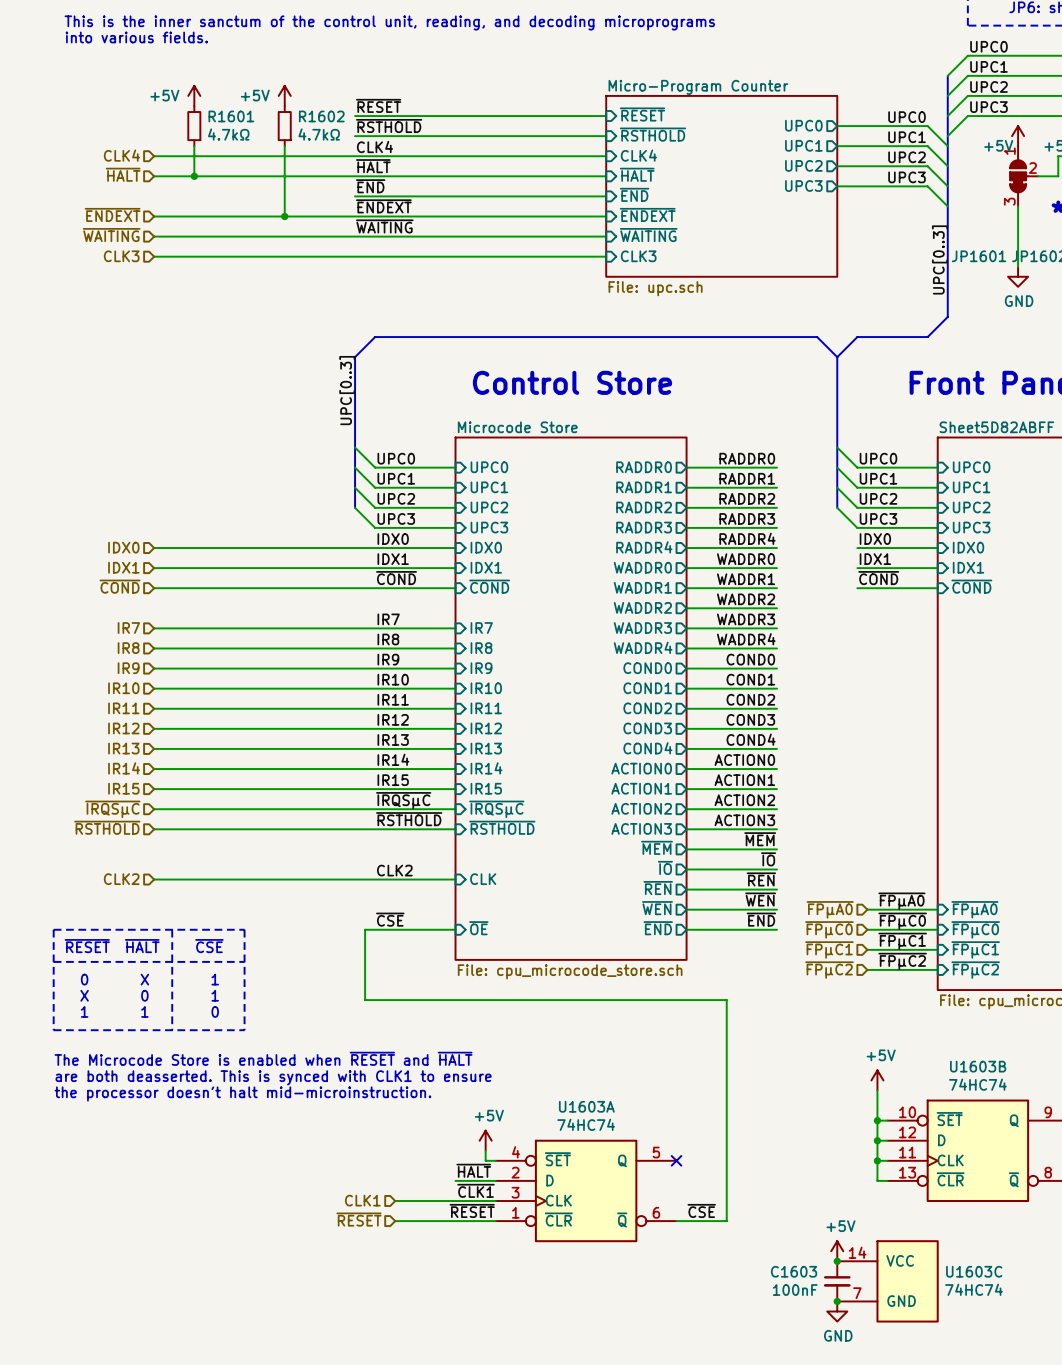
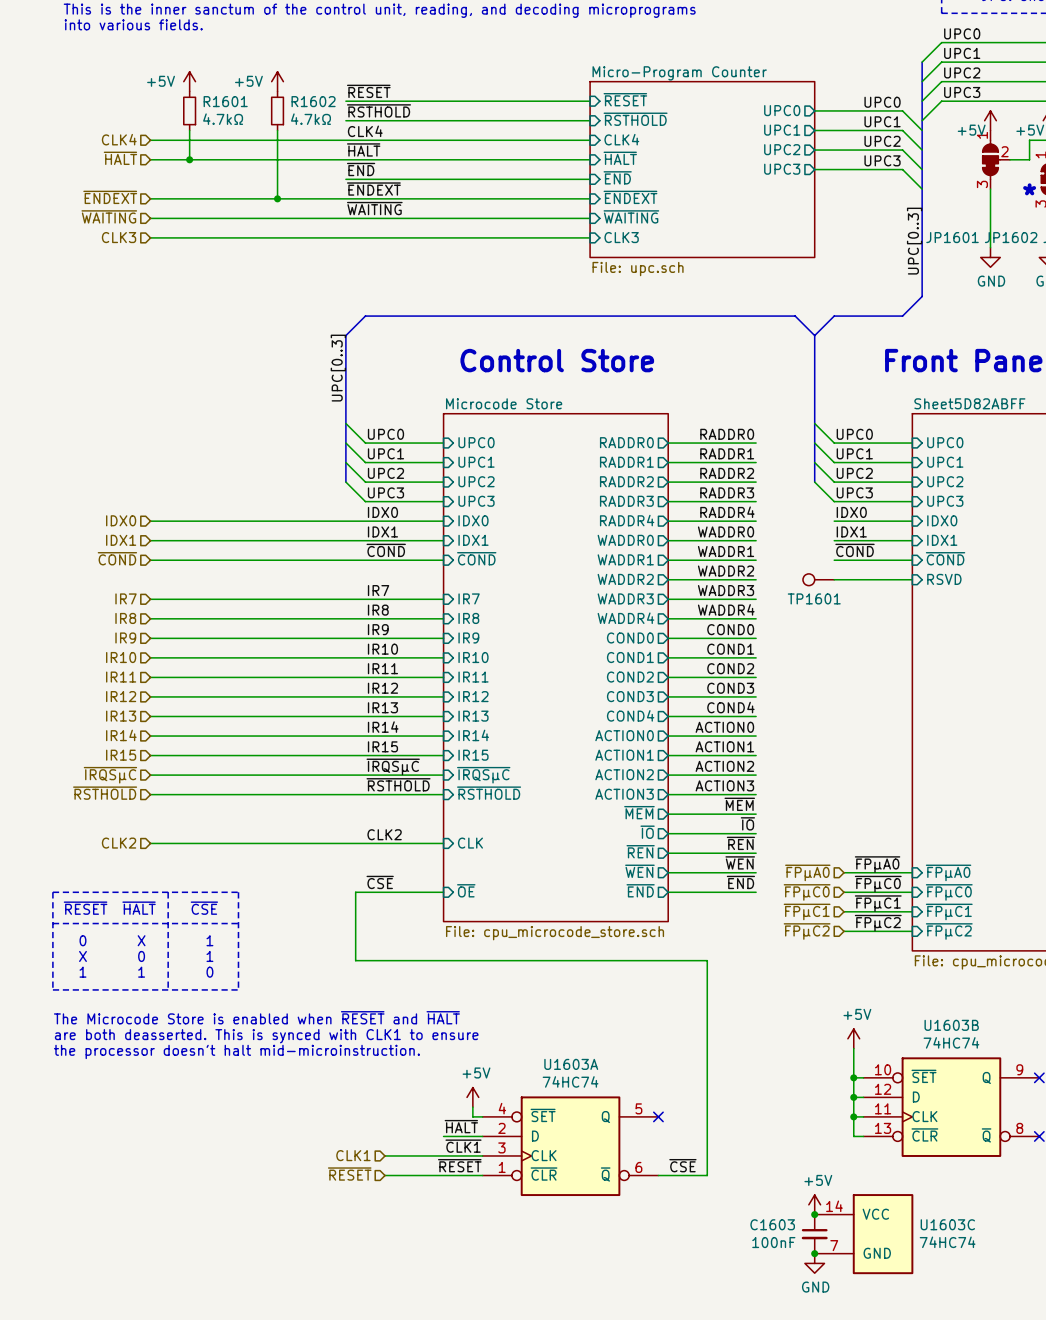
sheet pin: none -> RSVD (944, 579)
TP1601: none -> (818, 579)
wire: none -> (834, 579) (912, 579)

